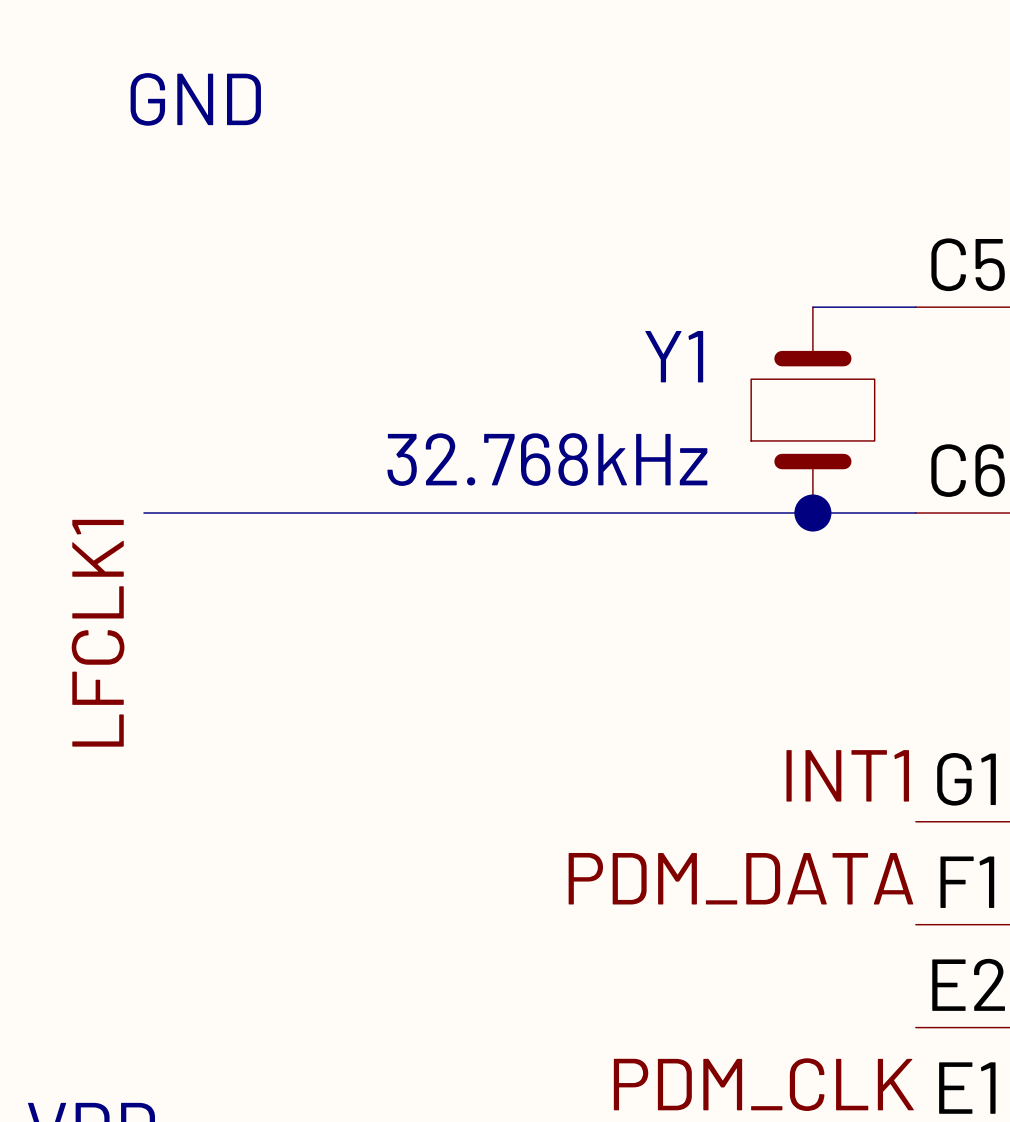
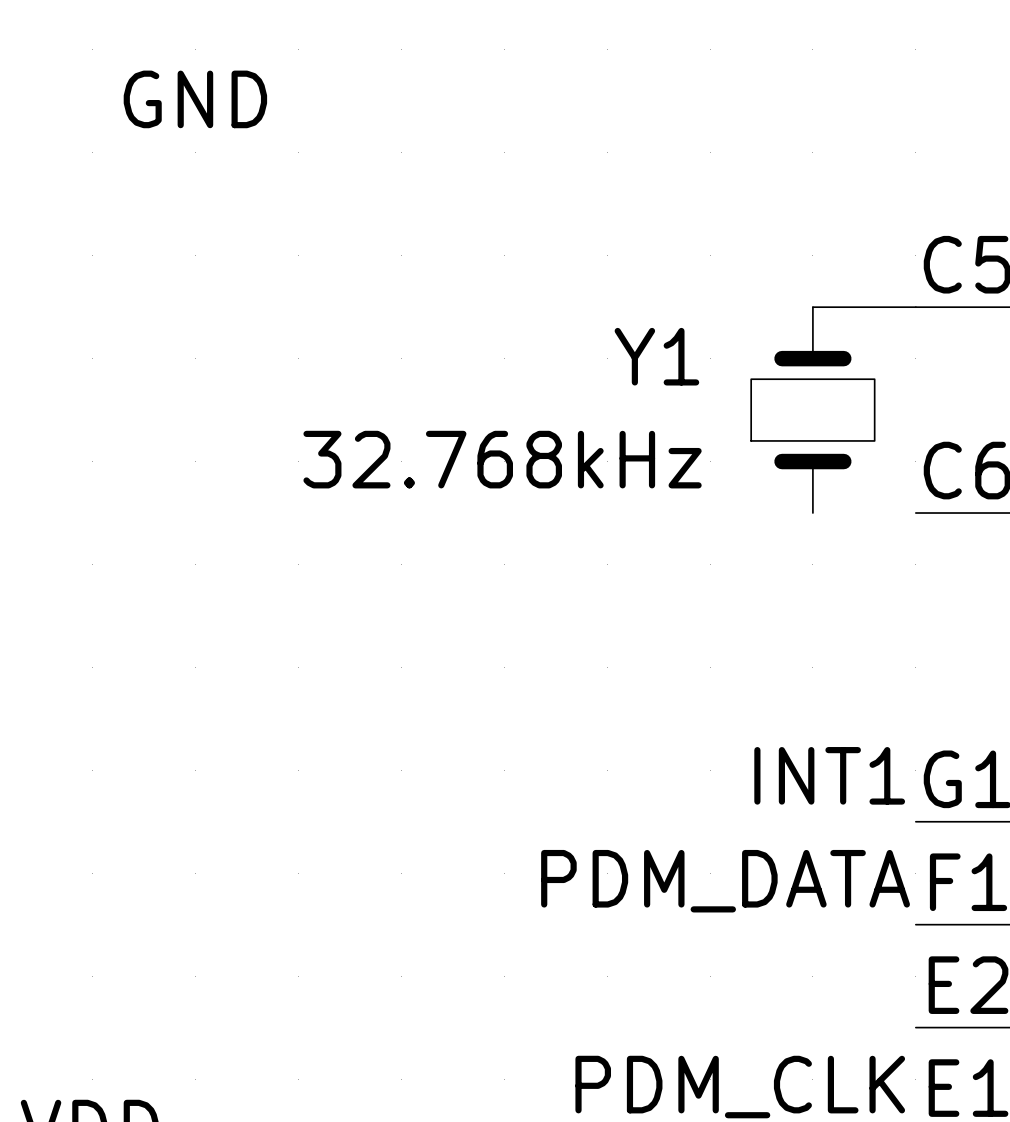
wire: (143, 513) (915, 513) -> none
junction: (812, 513) -> none
label: LFCLK1 (98, 633) -> none

